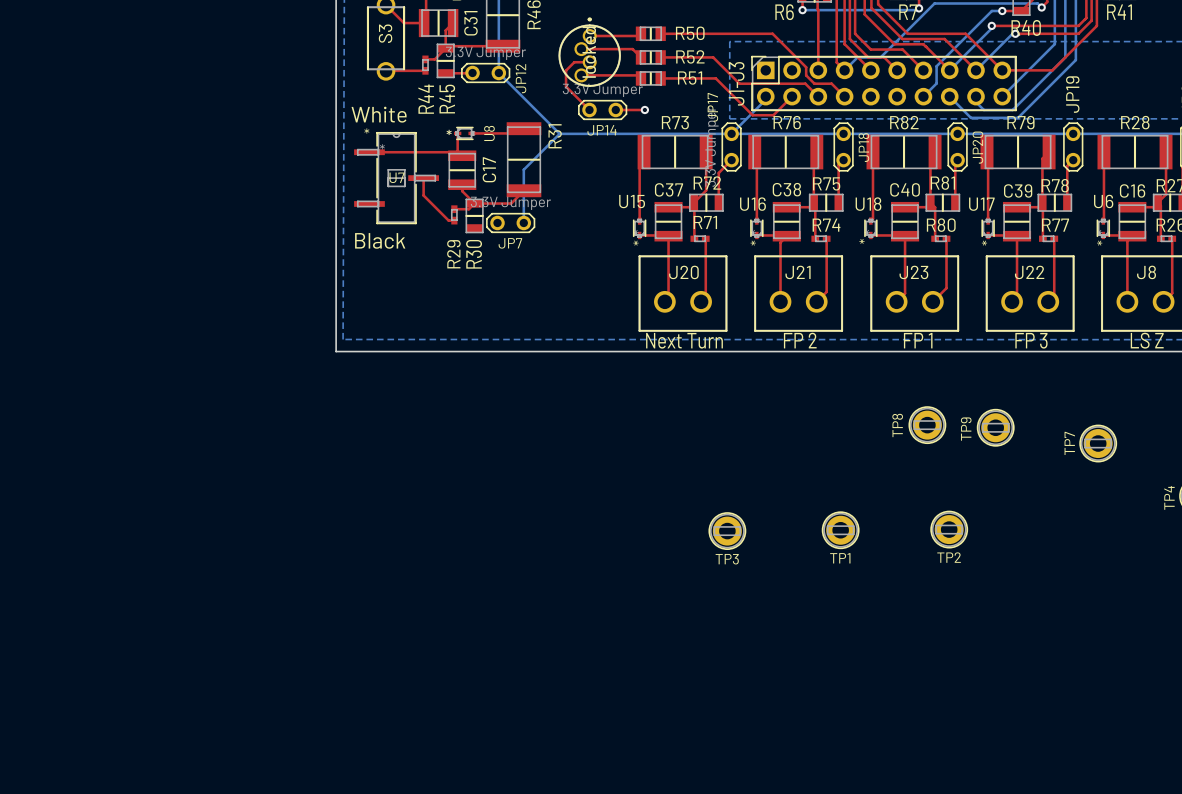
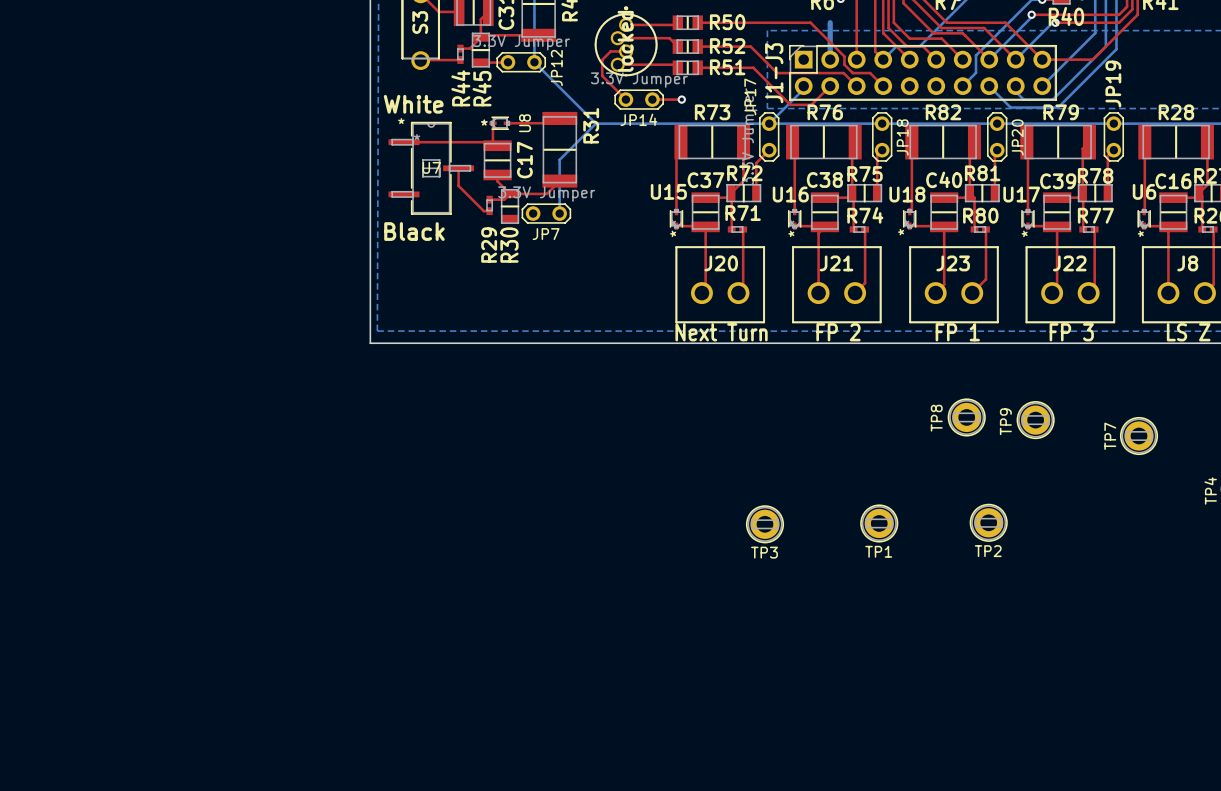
bottom track: none -> (830, 22) (830, 59)

